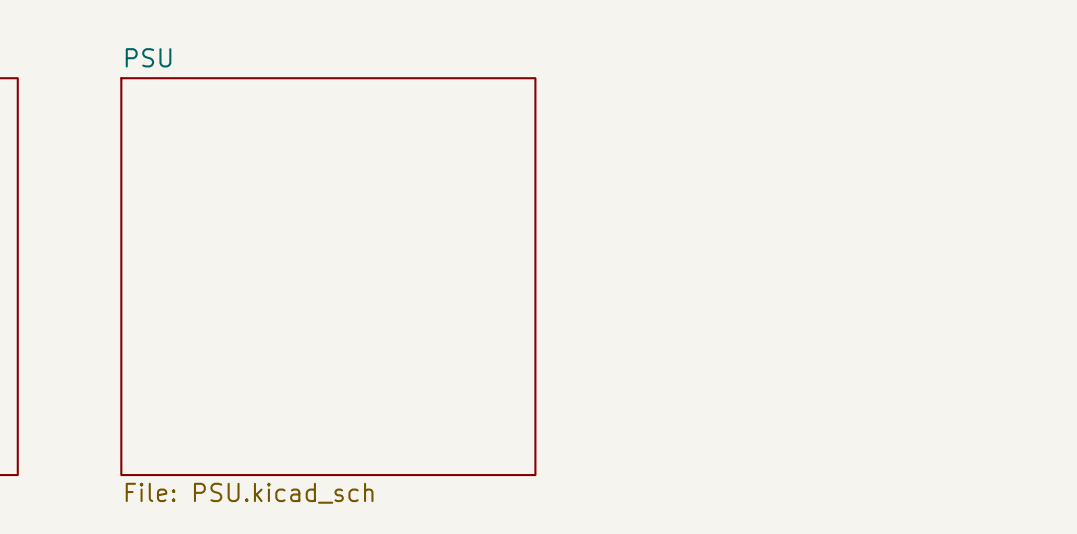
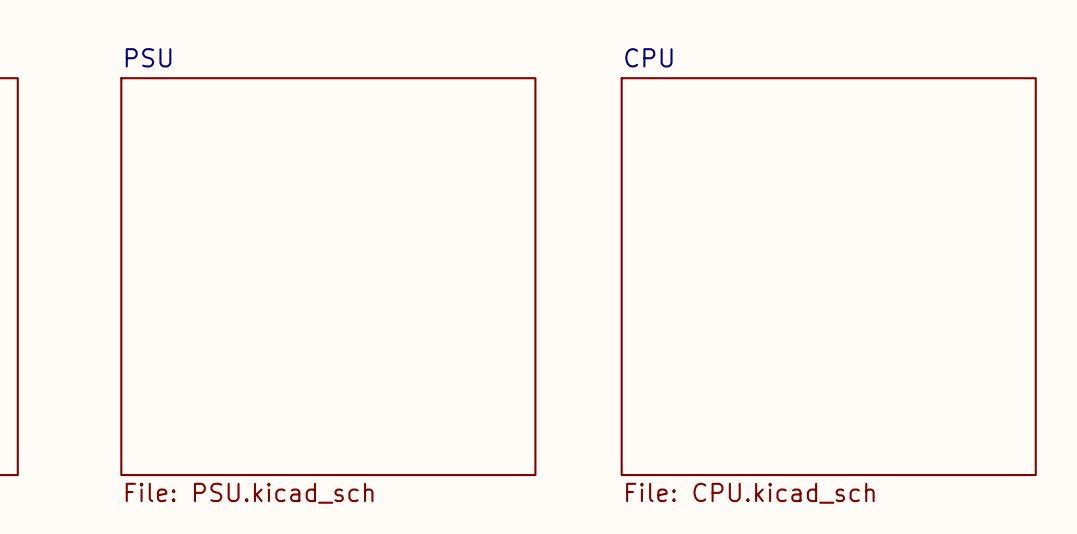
sheet CPU: none -> File: CPU.kicad_sch (828, 276)

